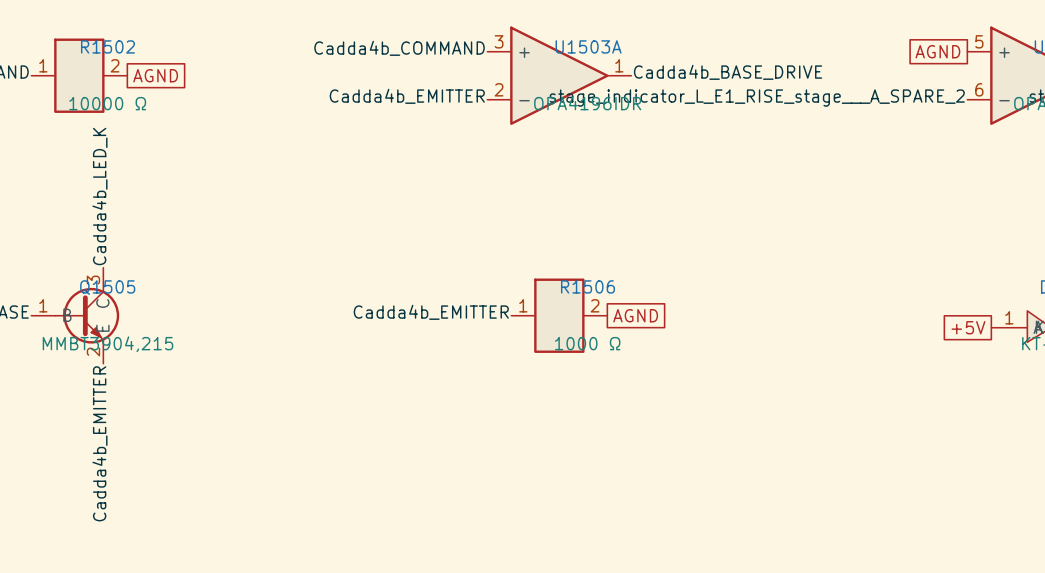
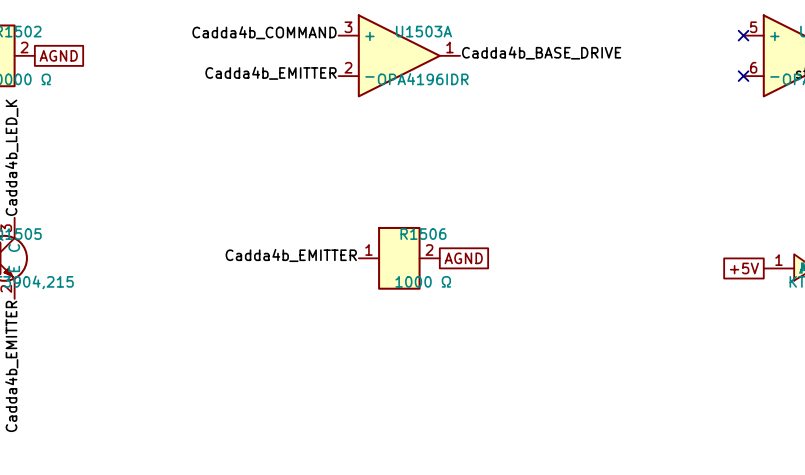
global label: AGND (937, 51) -> none
no-connect mark: none -> (743, 35)
label: stage_indicator_L_E1_RISE_stage___A_SPARE_2 (757, 98) -> none
no-connect mark: none -> (743, 76)

